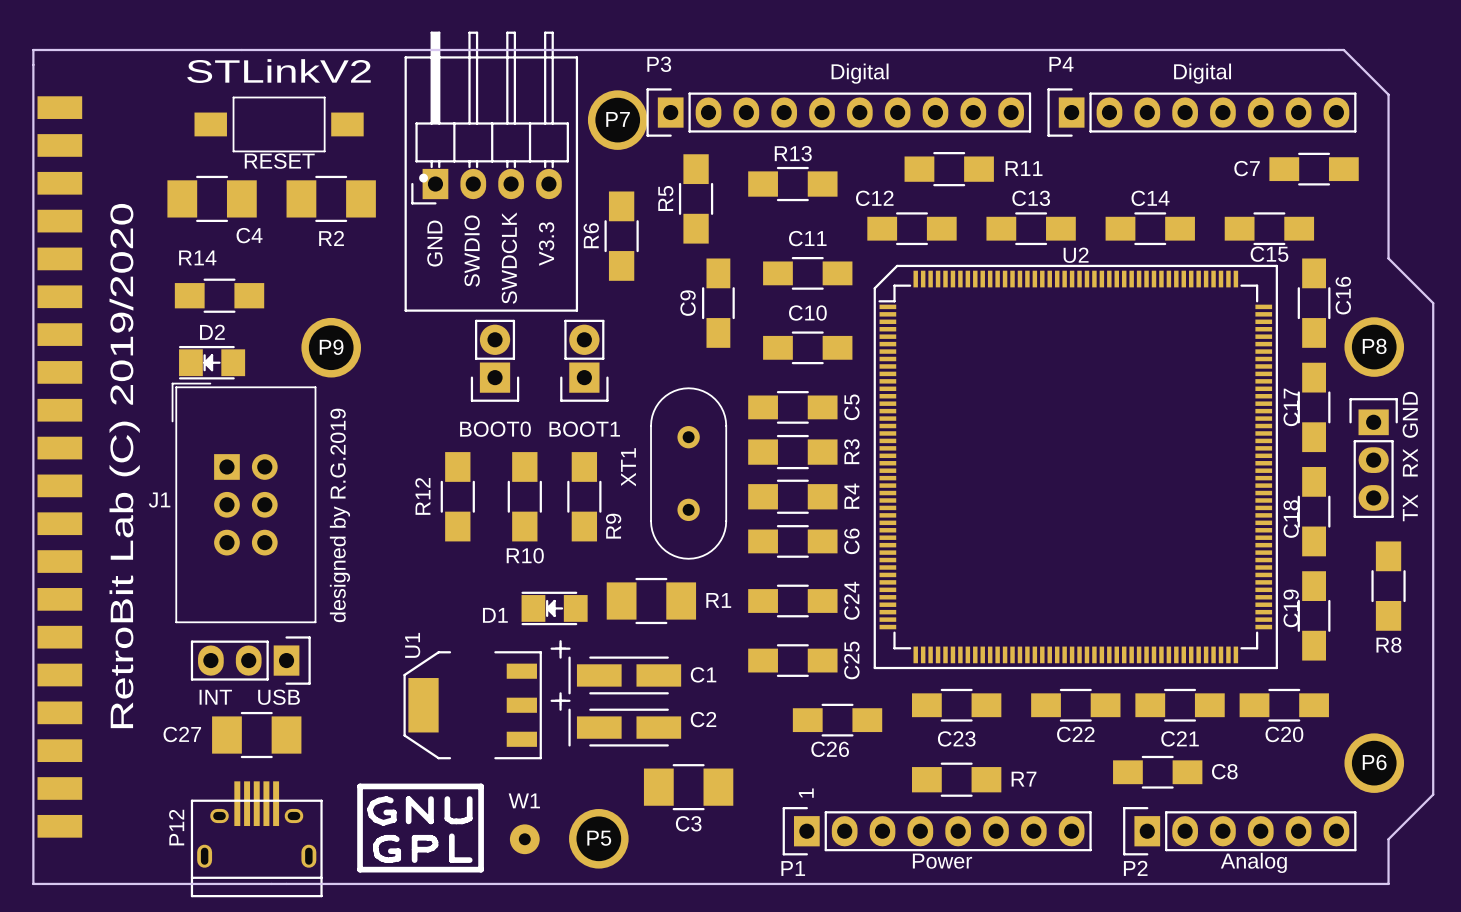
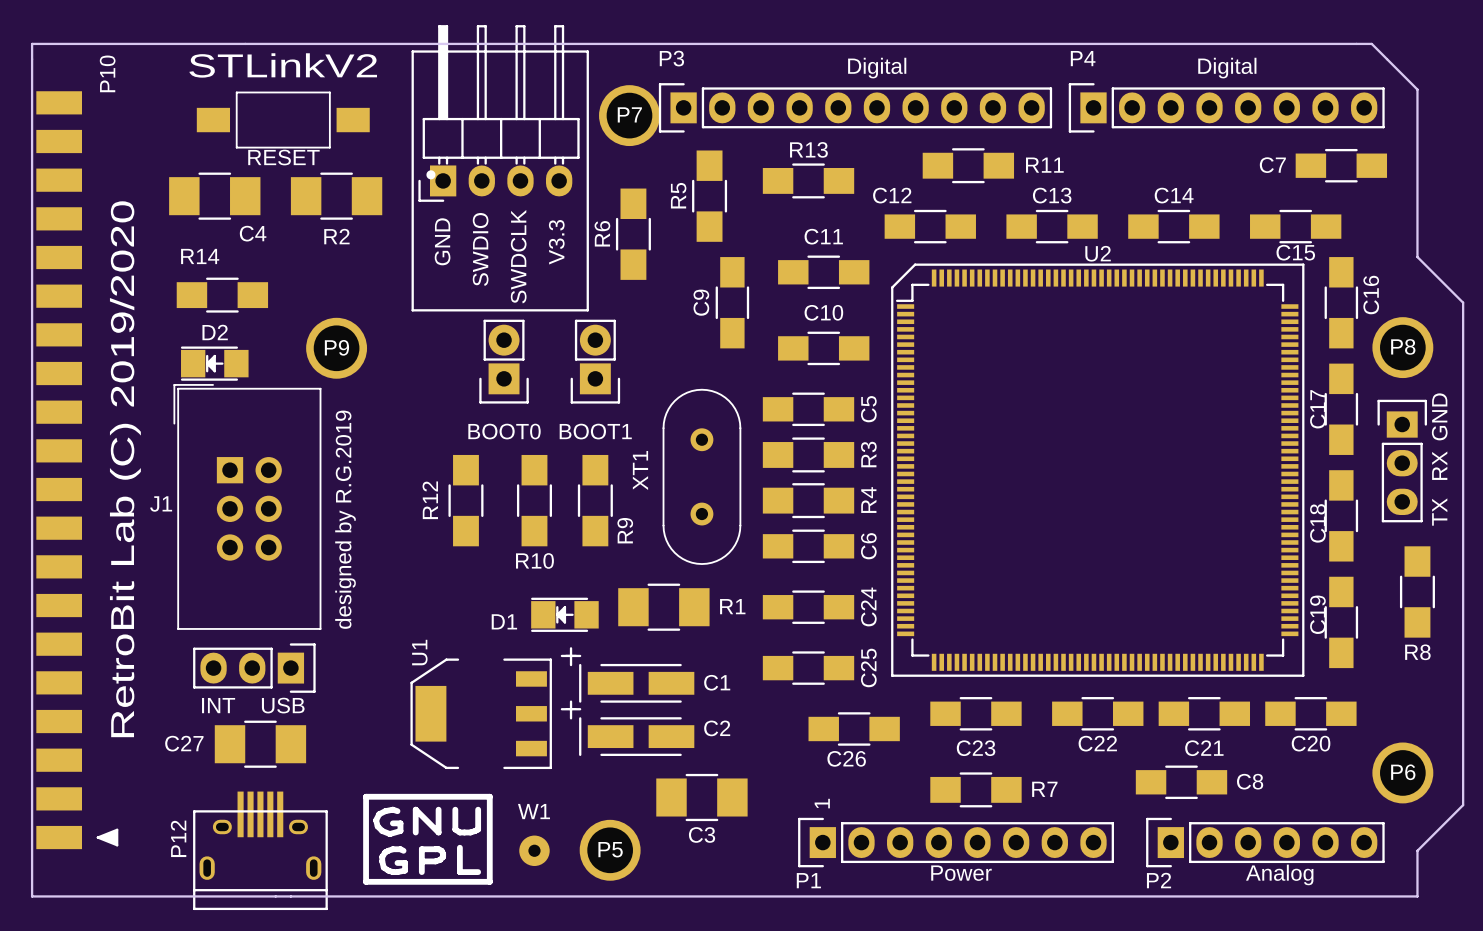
P10 side: bottom (59, 466) -> top (77, 470)

